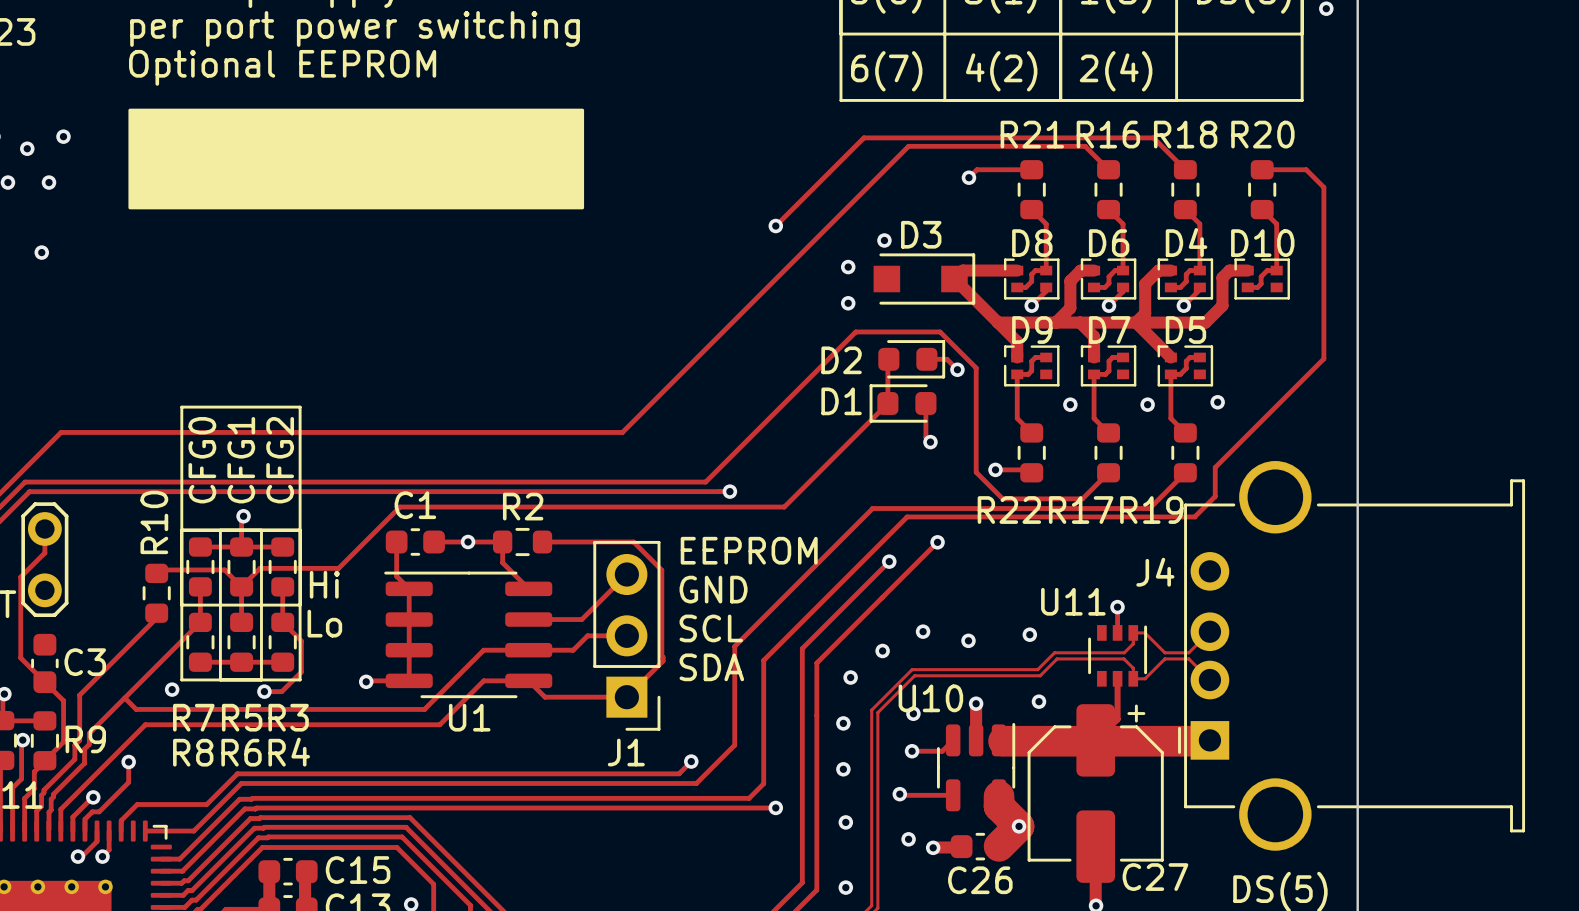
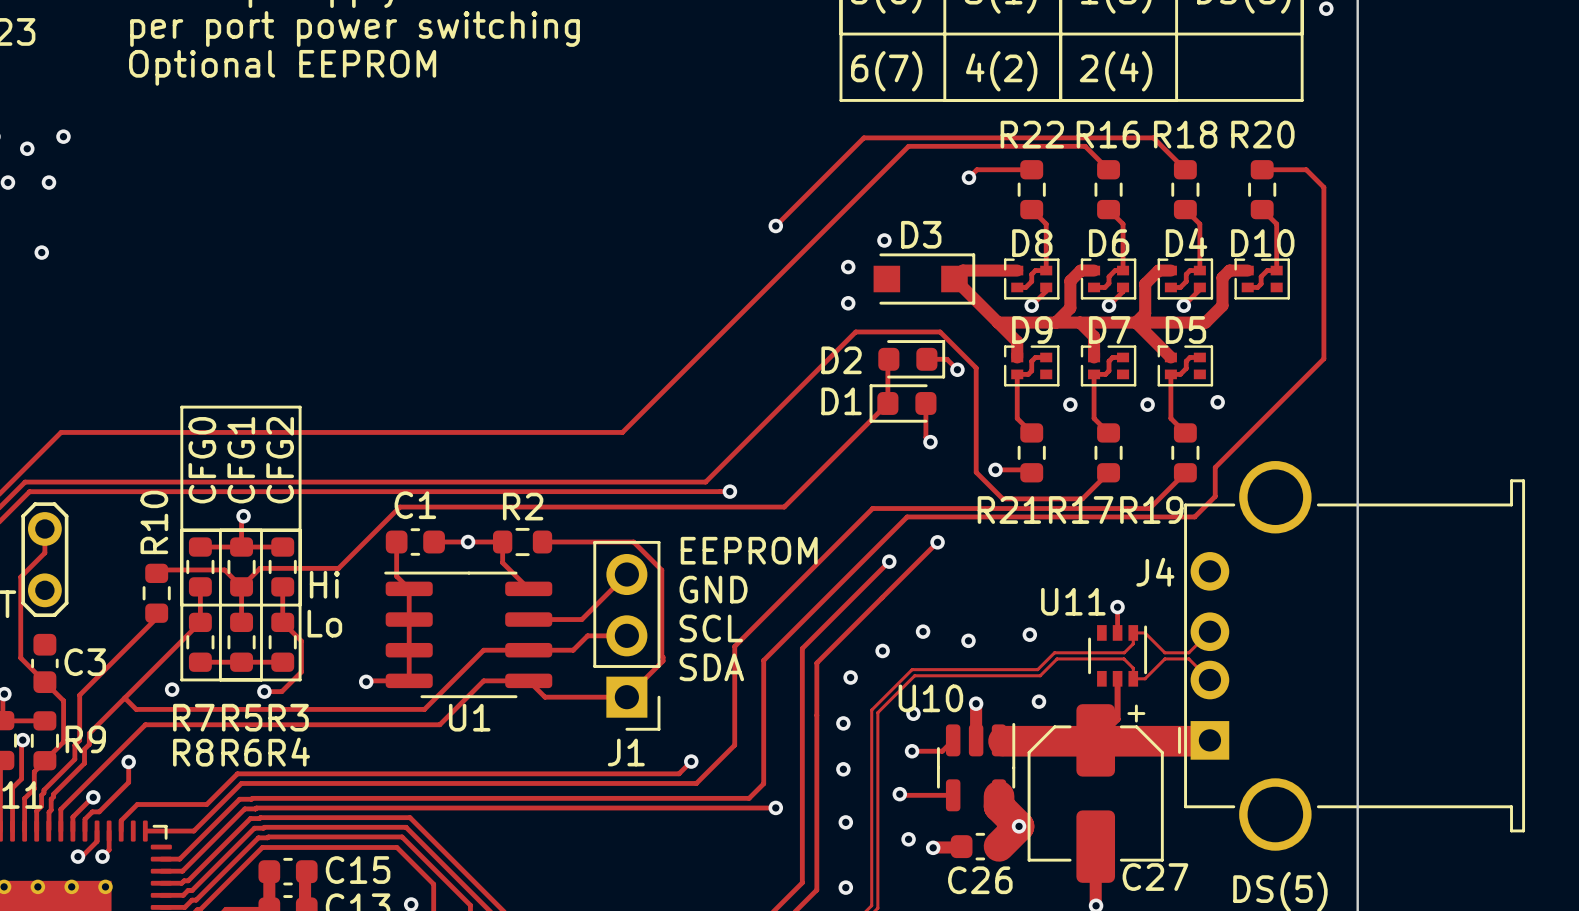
drawing: [128, 108, 585, 210] -> none
R21 name: R21 (1032, 134) -> R22 (1032, 134)
R22 name: R22 (1009, 510) -> R21 (1009, 510)

